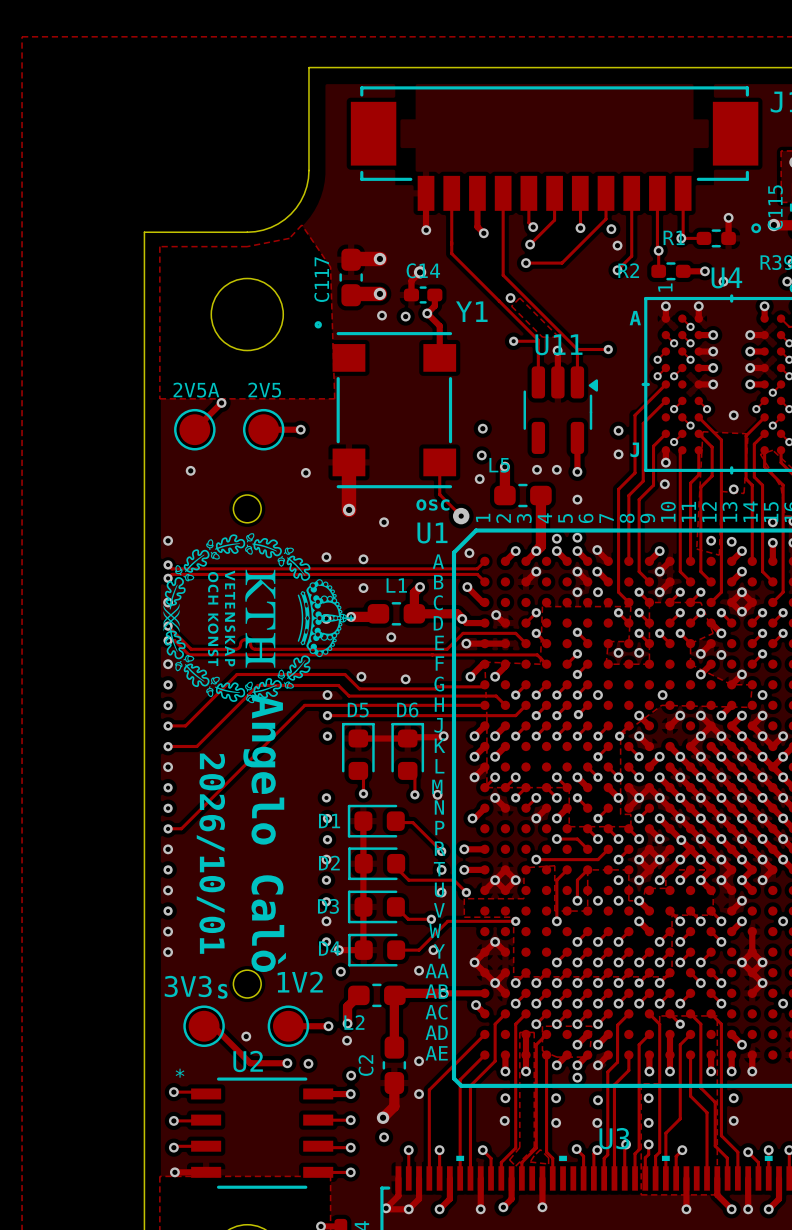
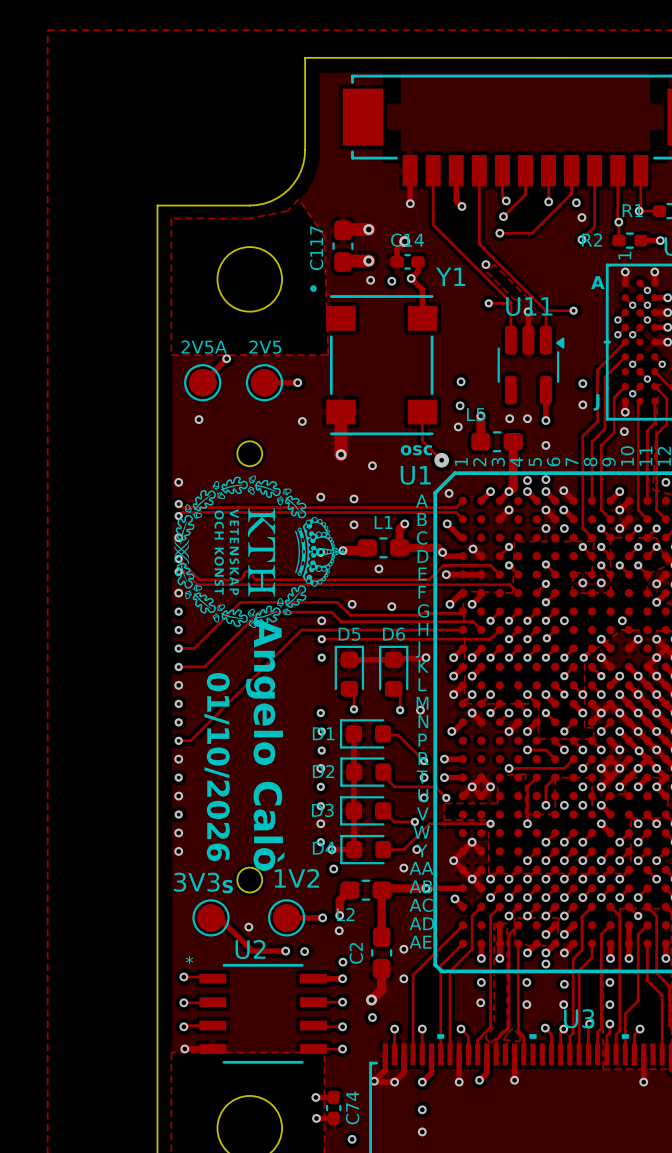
text: 2026/10/01 (210, 853) -> 01/10/2026 (217, 767)

